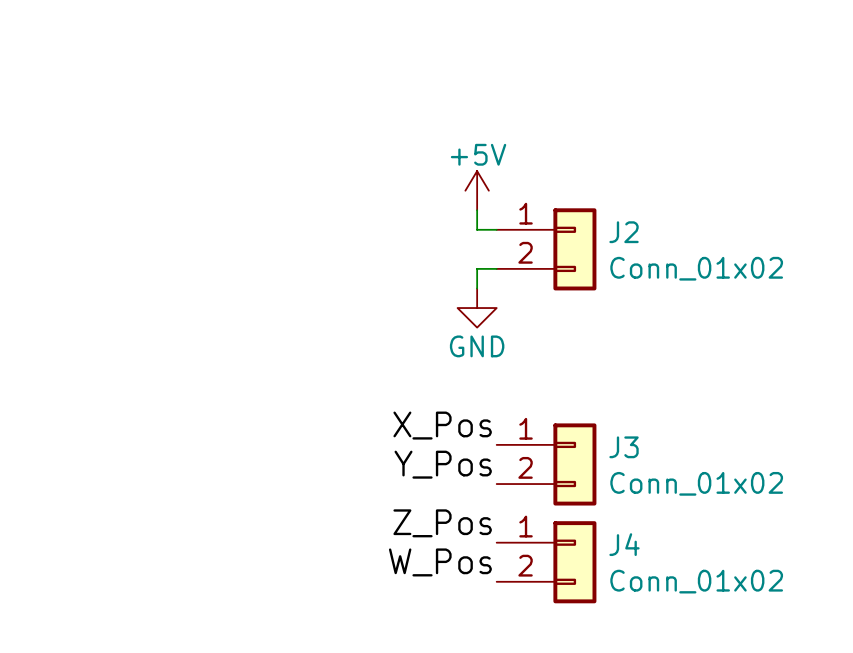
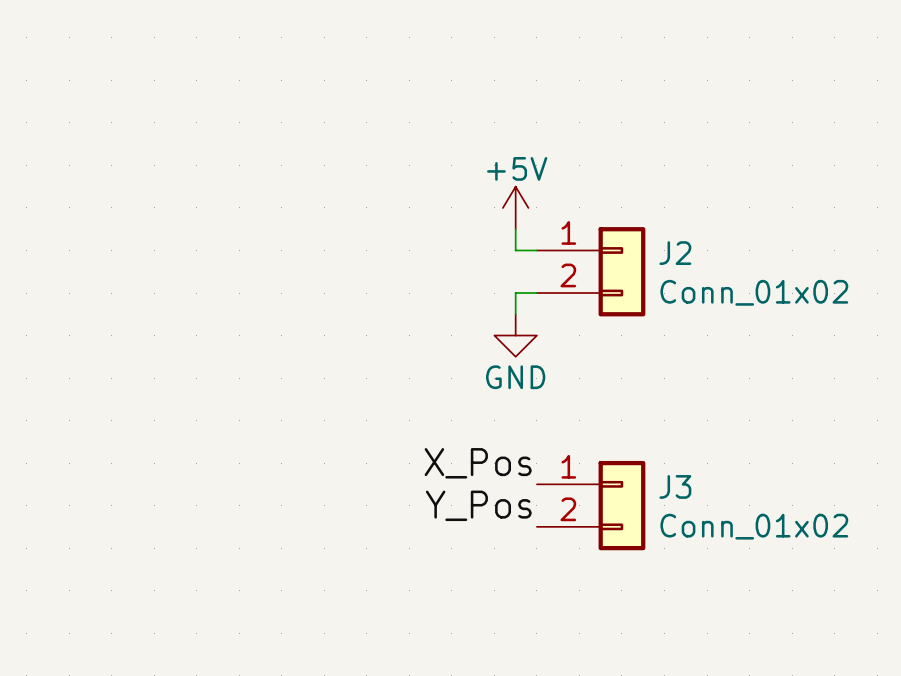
label: Z_Pos (442, 523) -> none
label: W_Pos (440, 562) -> none
J4: Conn_01x02 (546, 562) -> none

